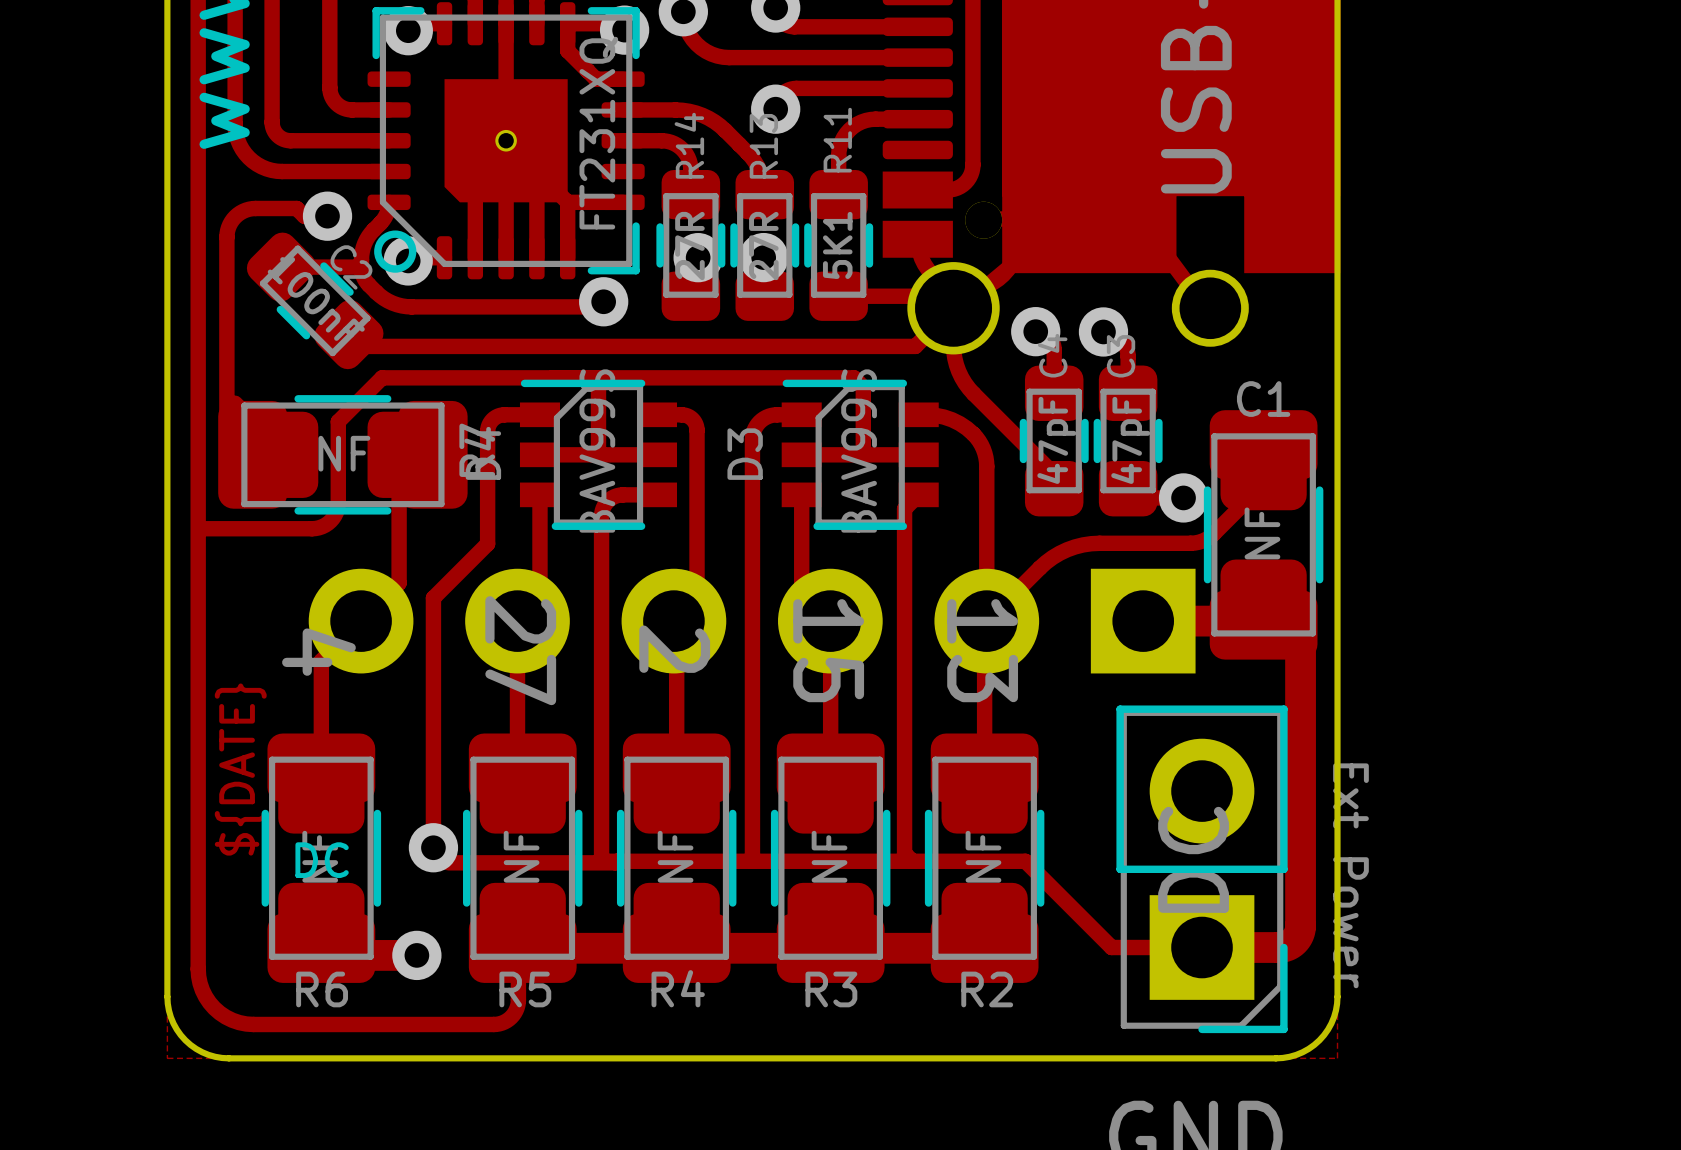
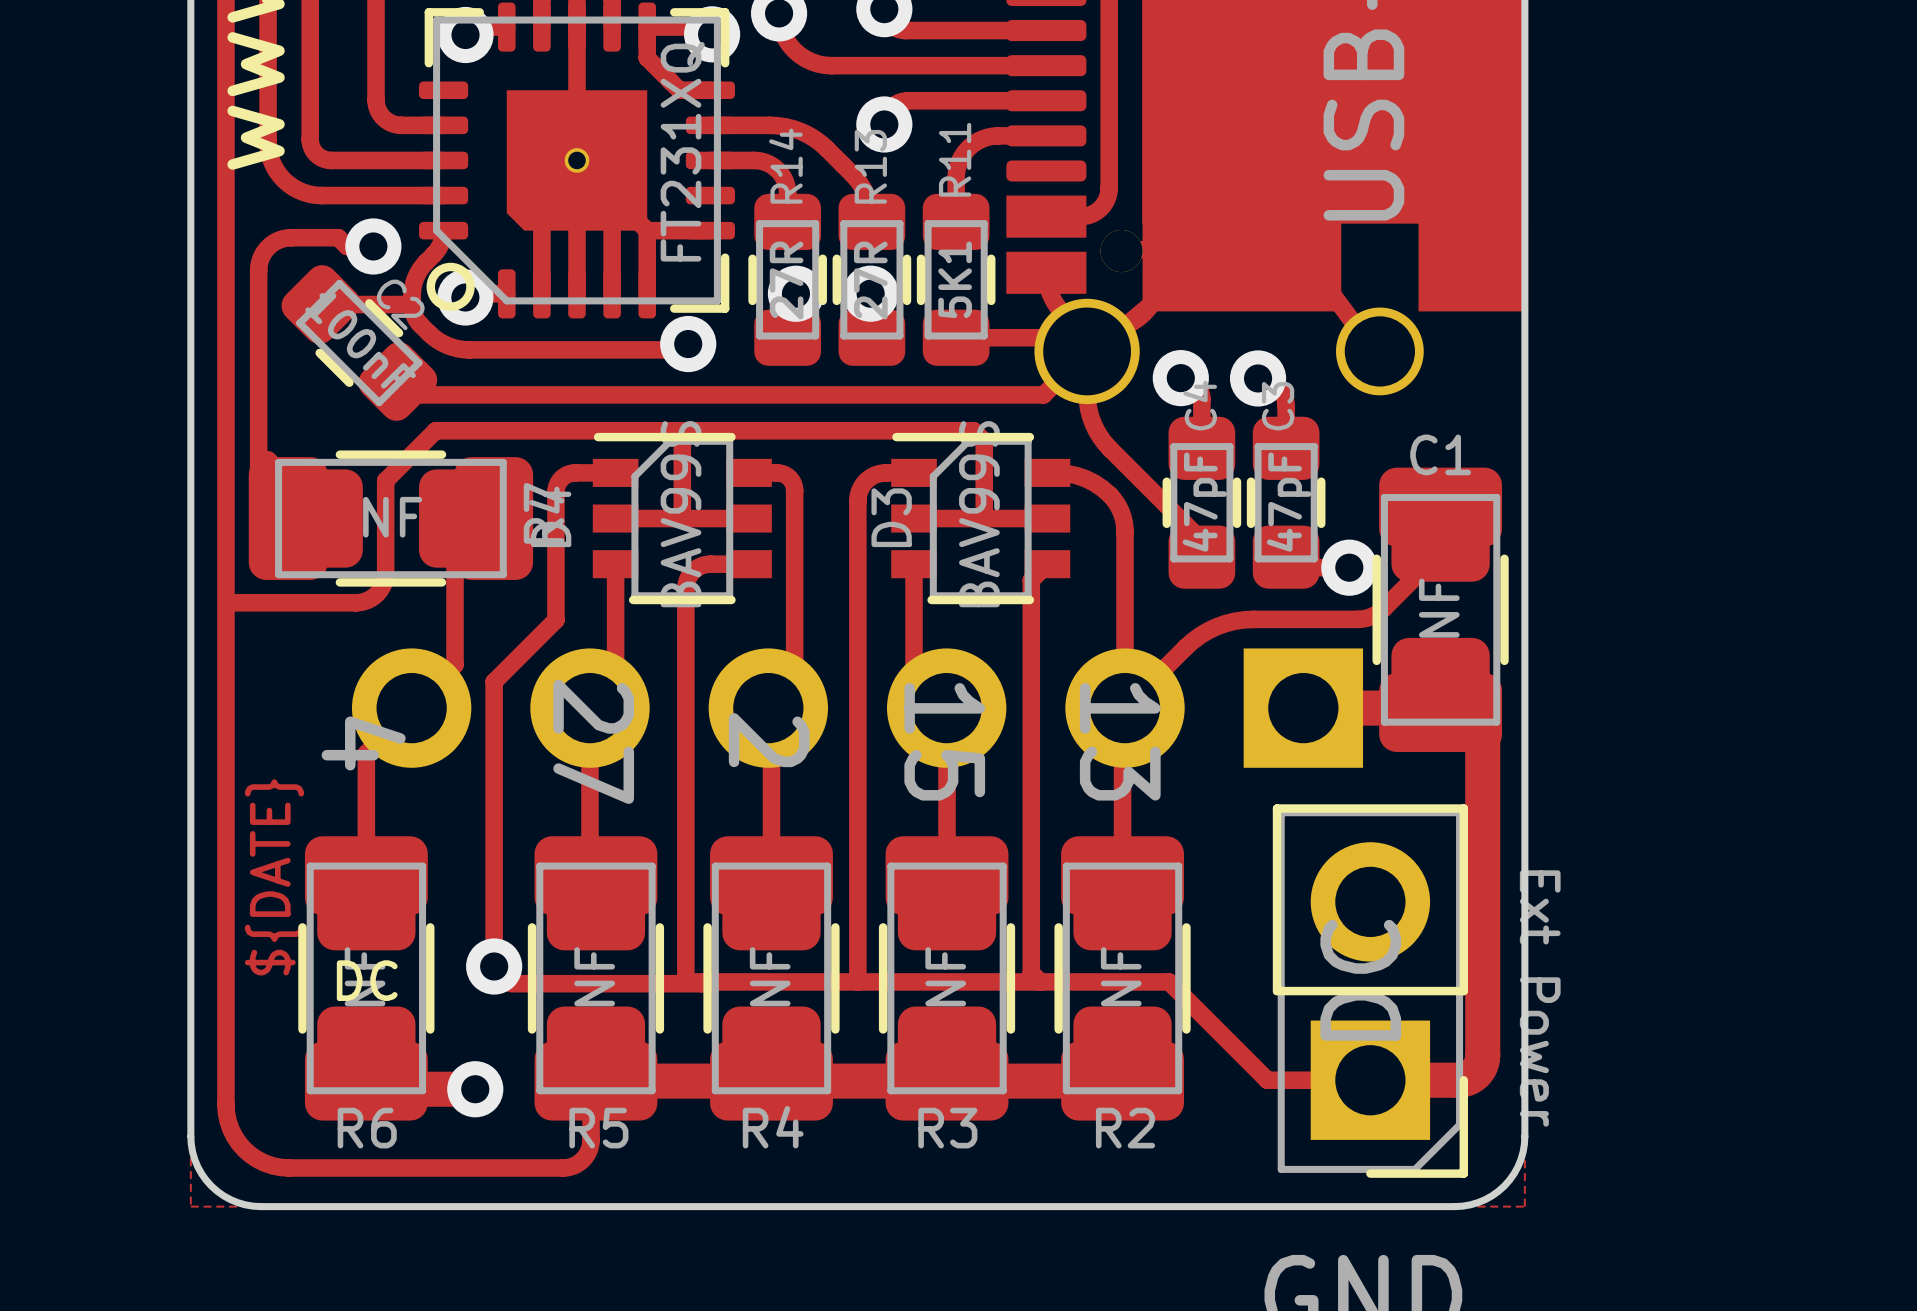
D3 name position: D3 (745, 454) -> D3 (891, 517)

